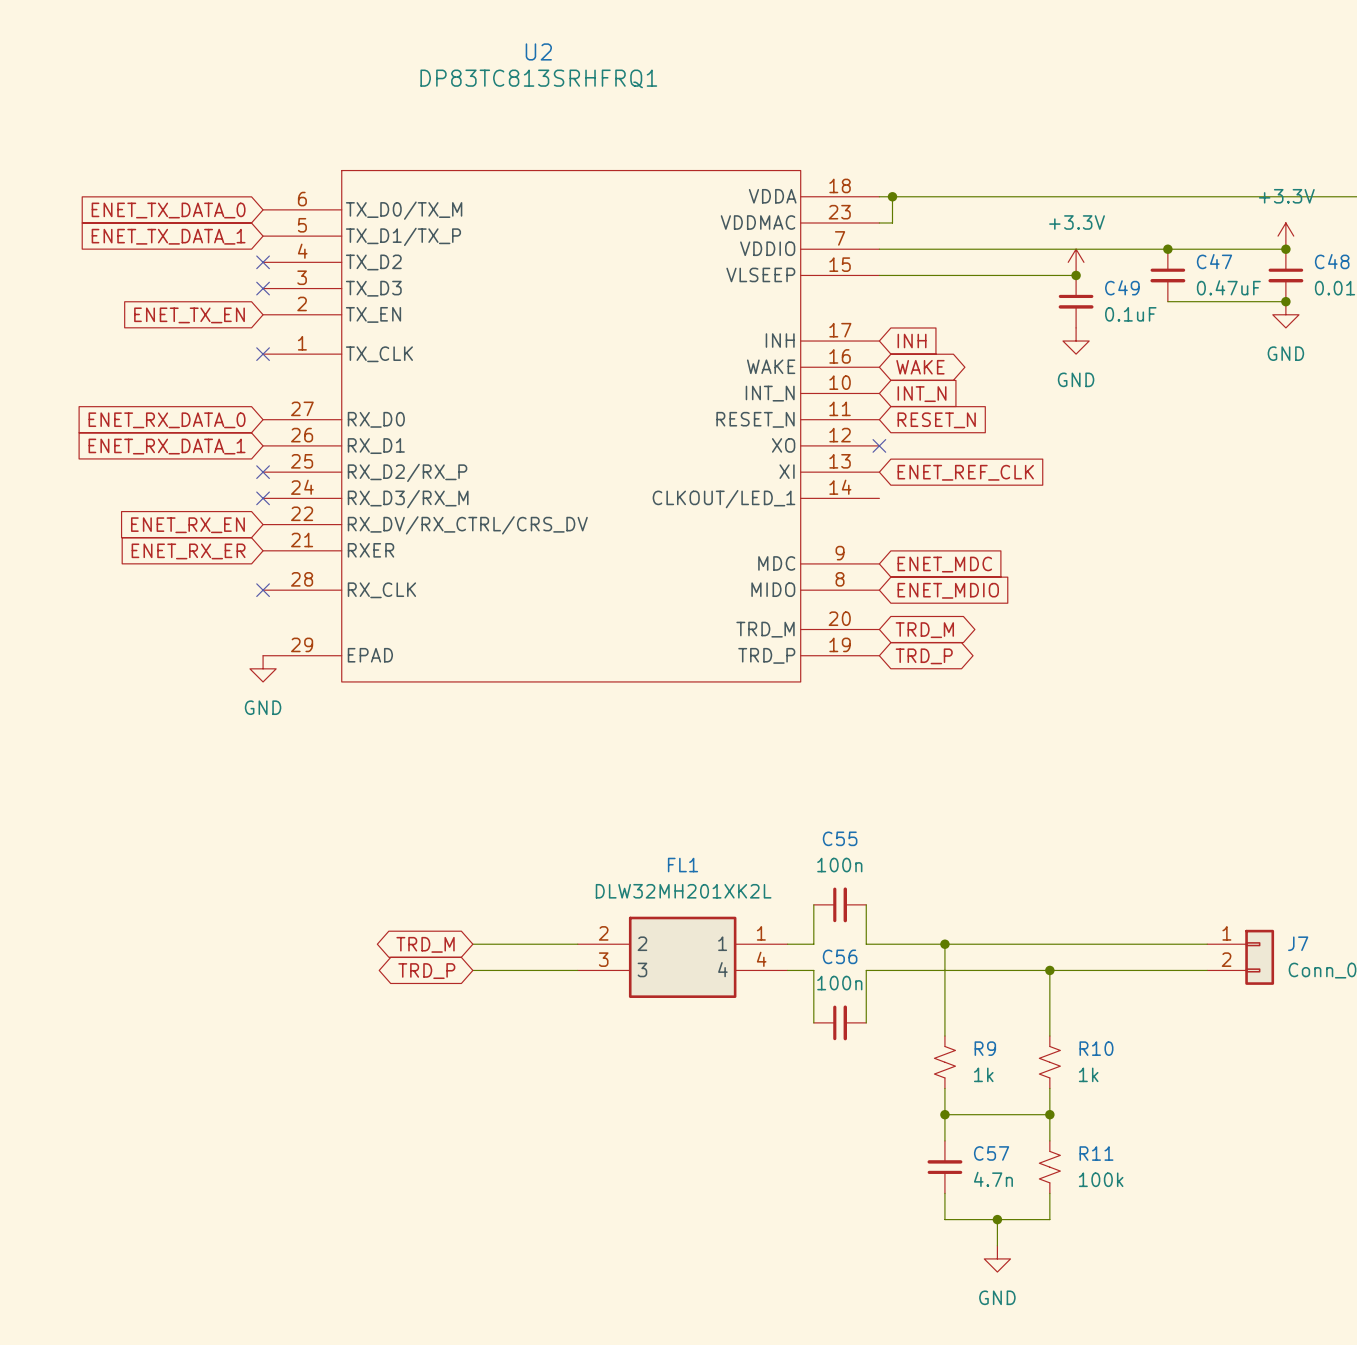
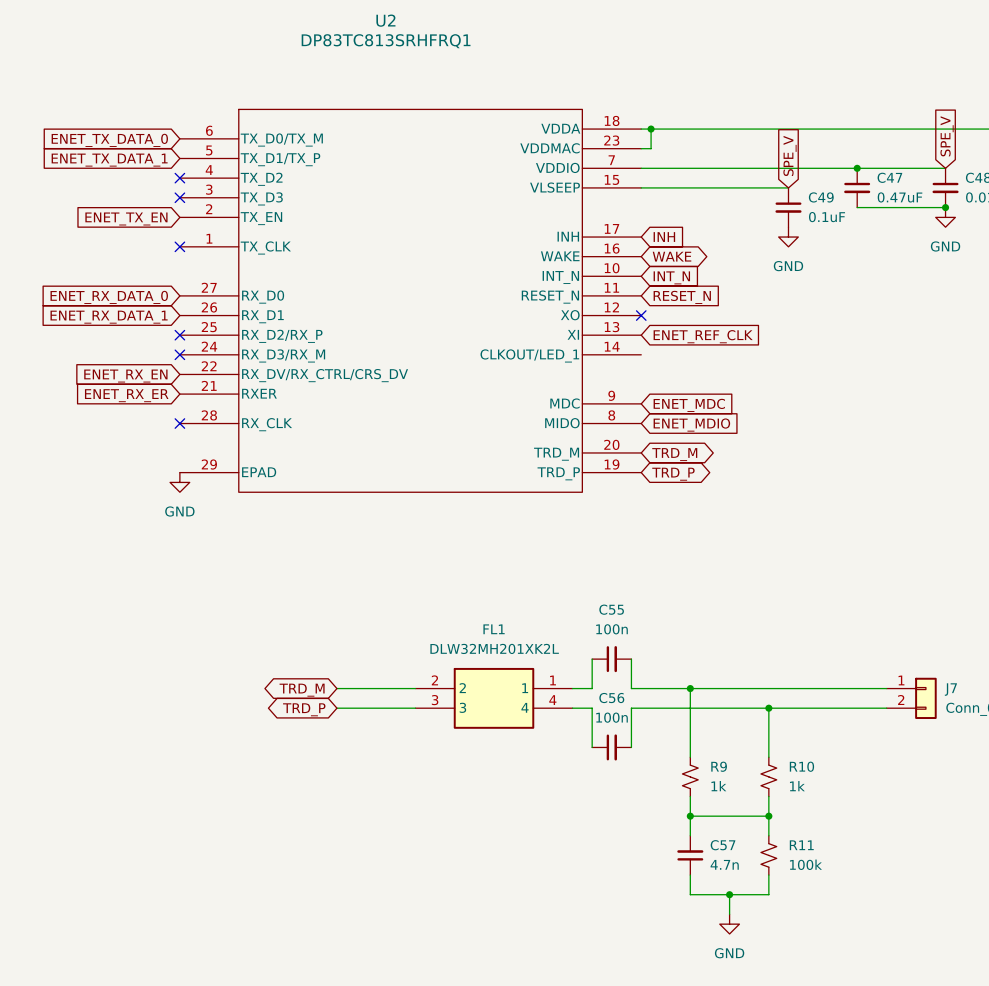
global label: none -> SPE_V (947, 136)
global label: none -> SPE_V (789, 155)
power symbol: +3.3V (1285, 236) -> none
junction: (1285, 249) -> none
power symbol: +3.3V (1076, 262) -> none
junction: (1076, 275) -> none

